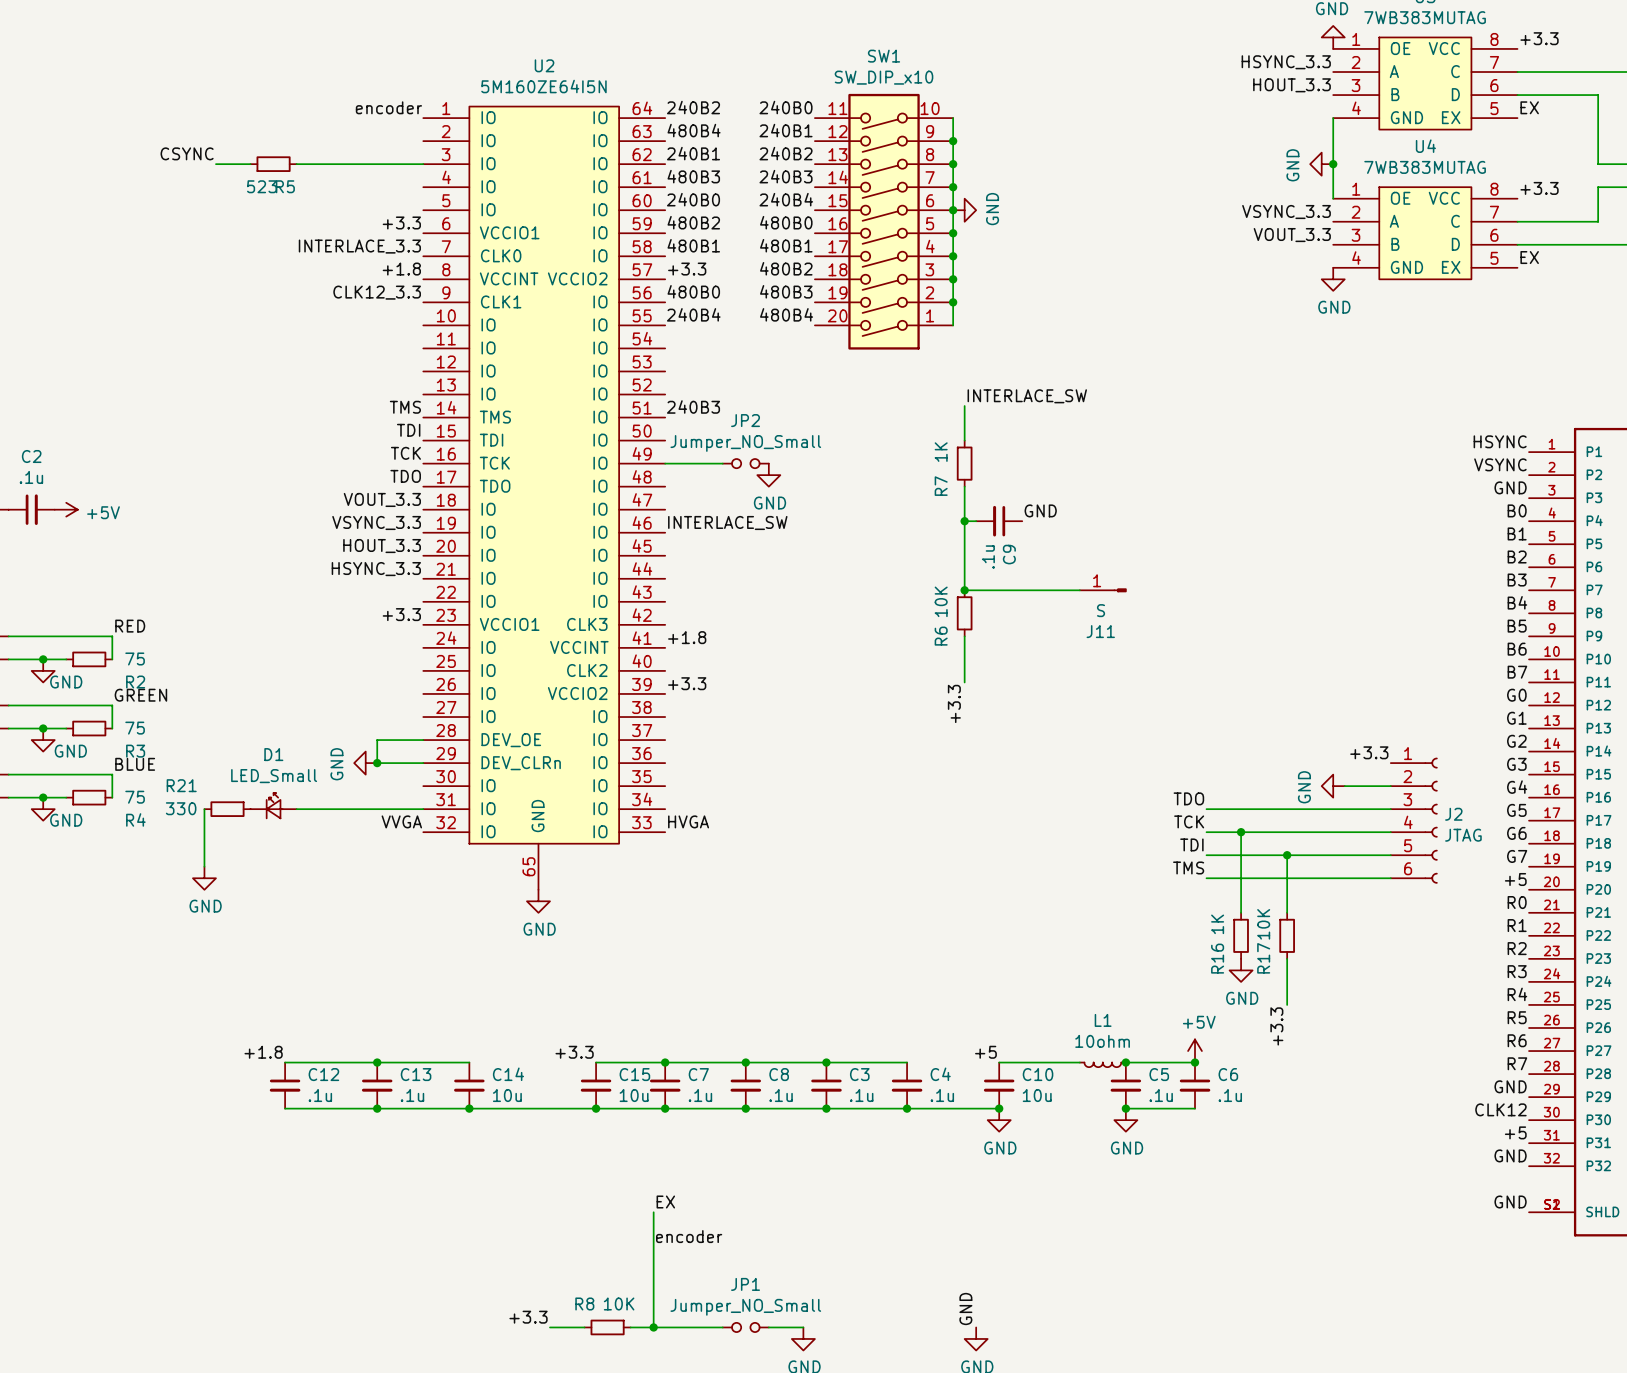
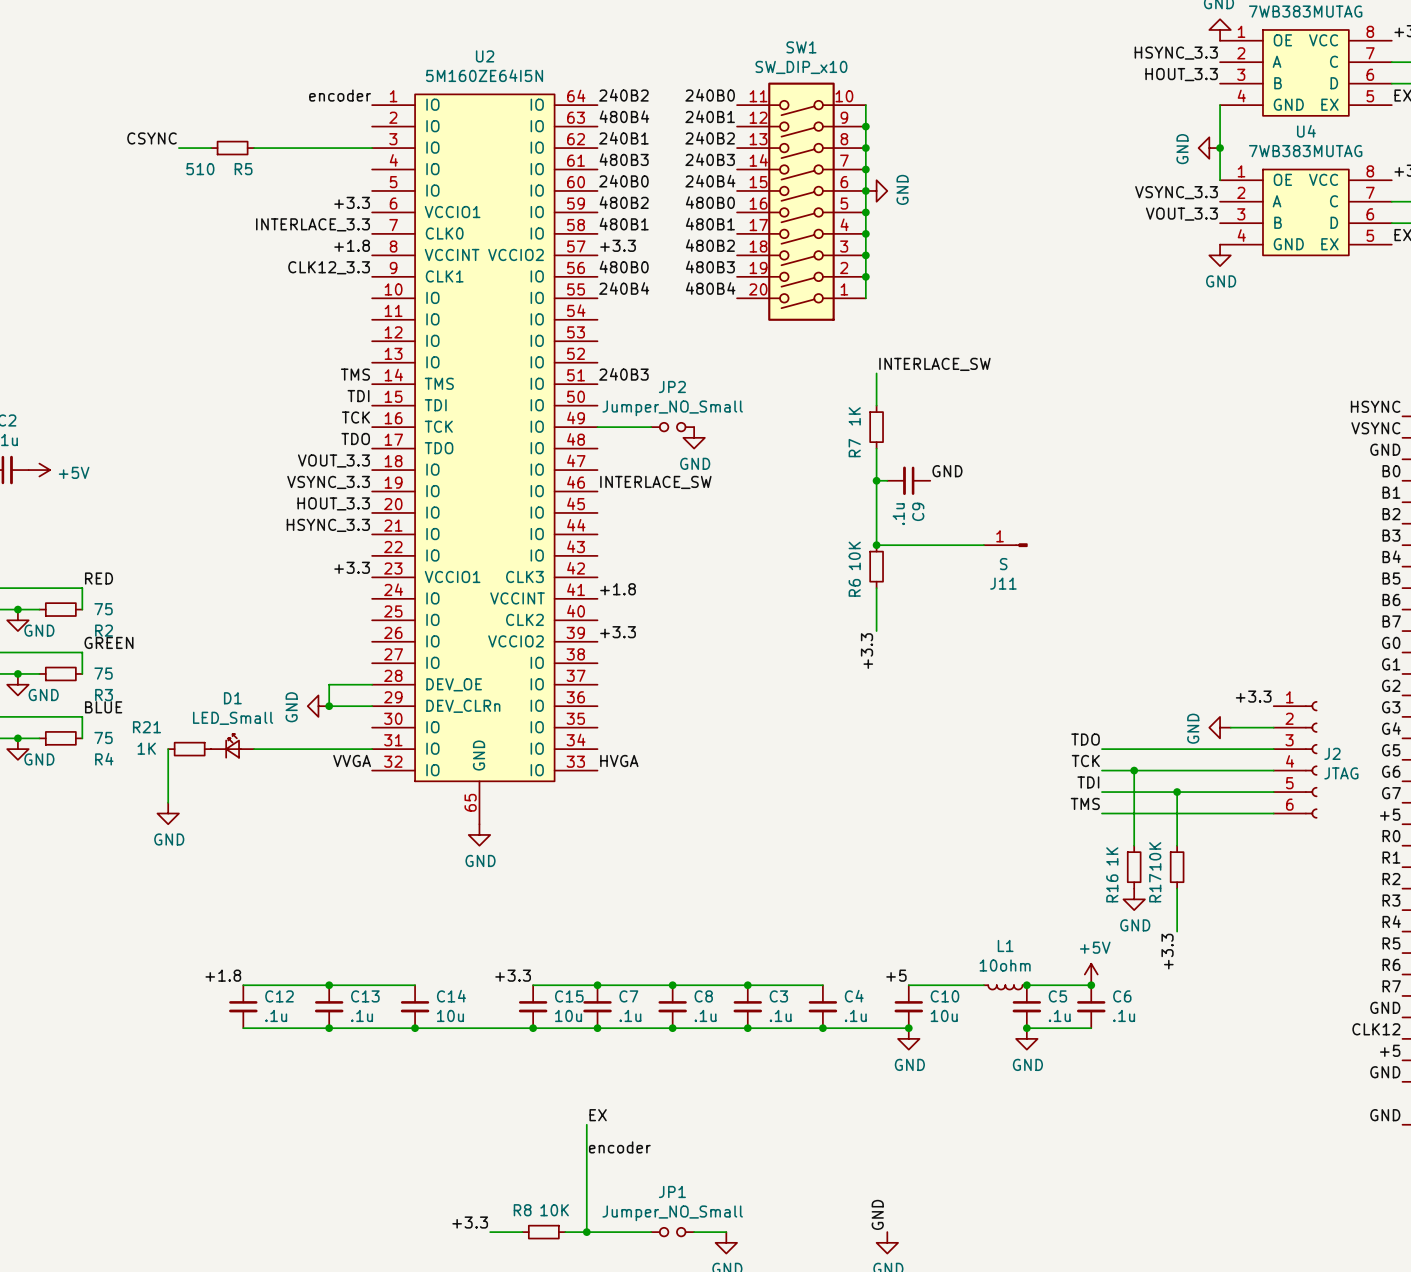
R5 value: 523 (262, 186) -> 510 (200, 169)
R21 value: 330 (181, 808) -> 1K (146, 748)

